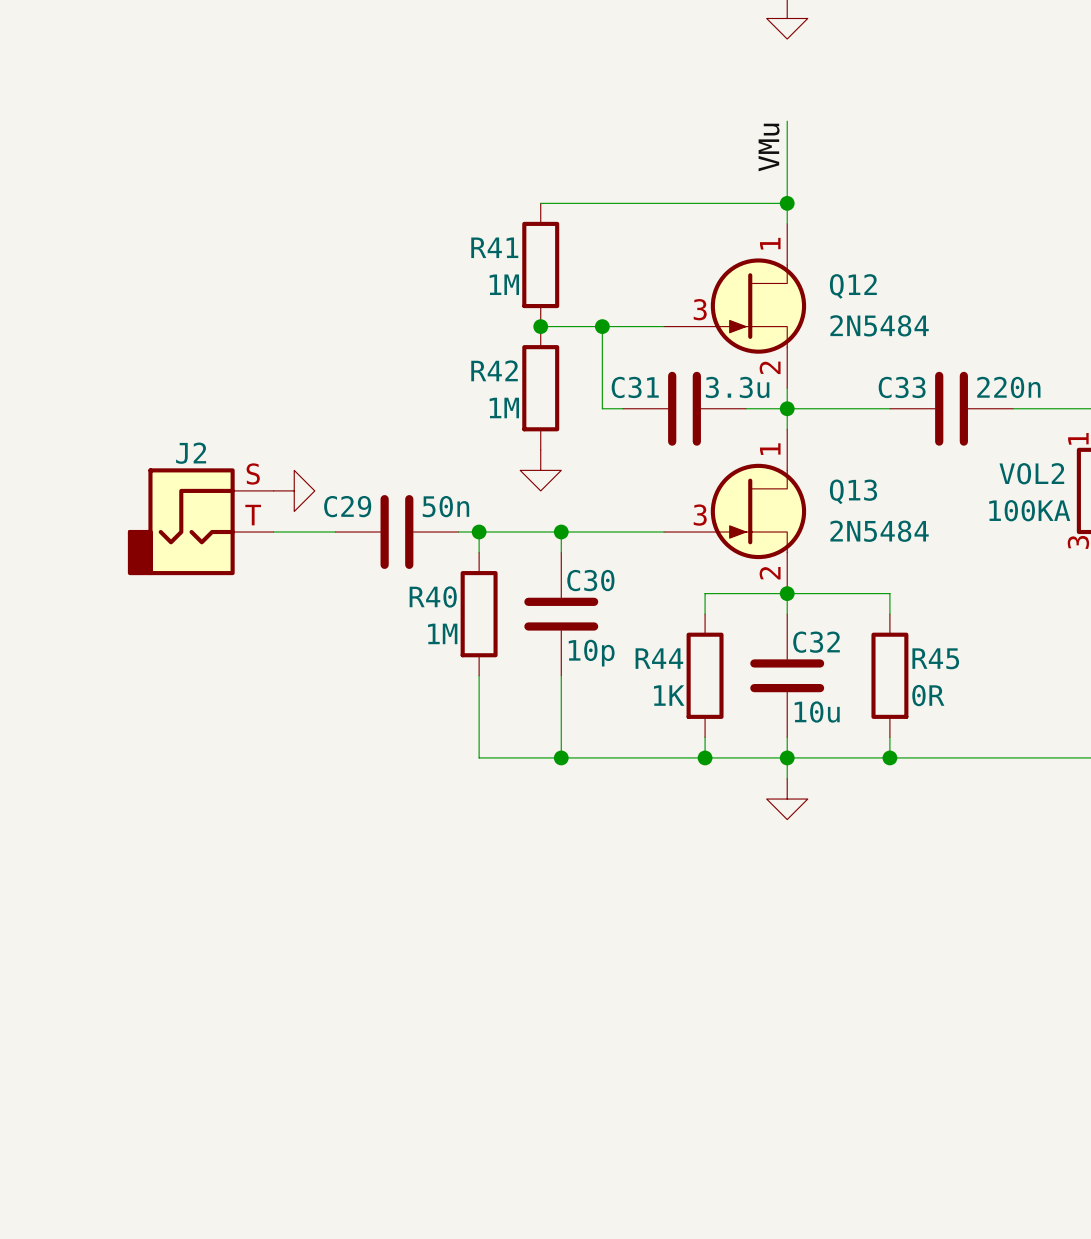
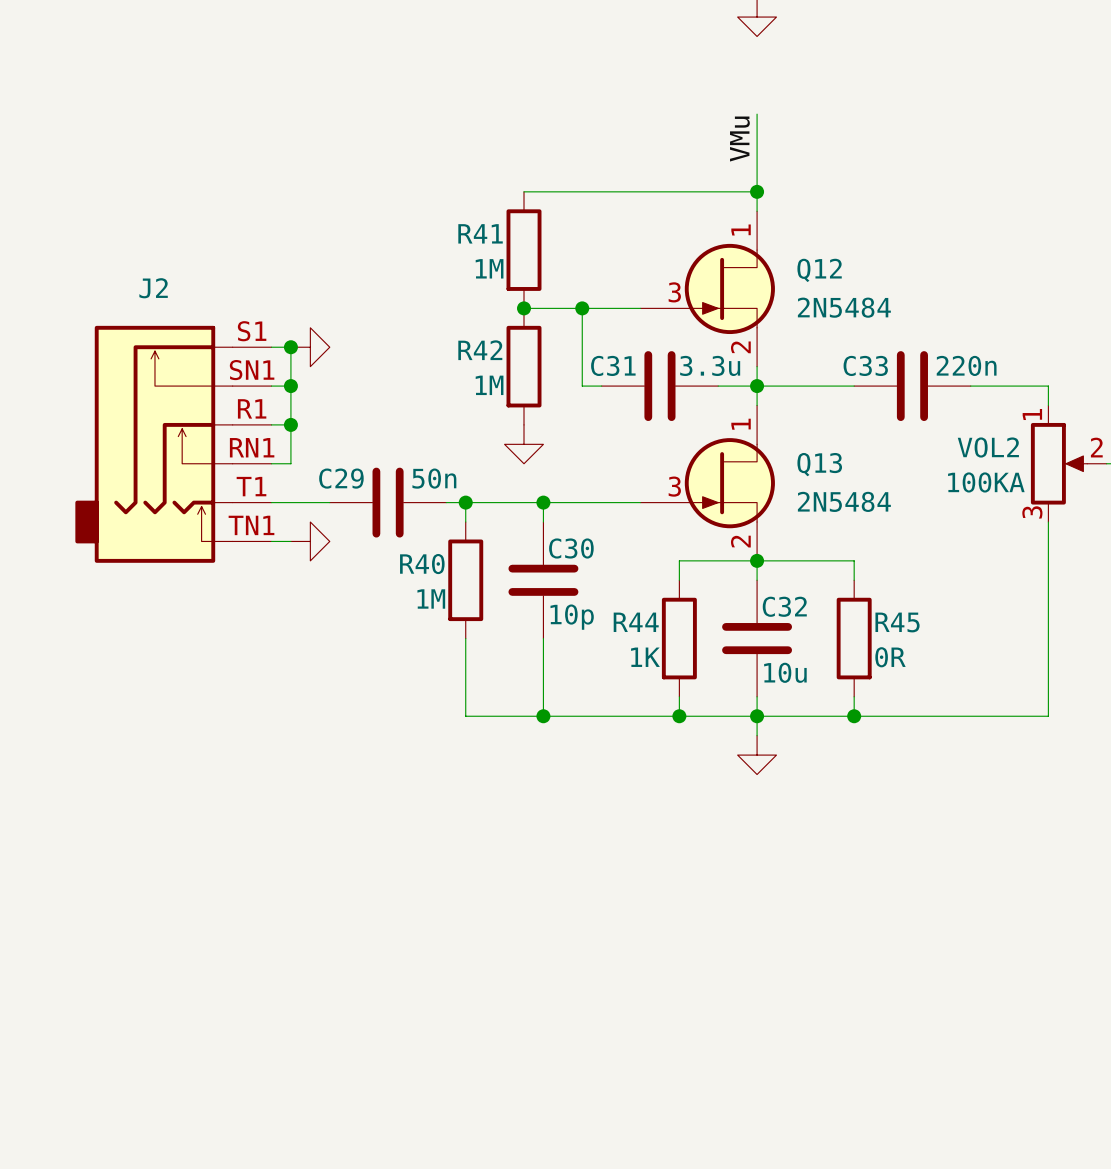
wire: none -> (271, 347) (290, 347) (290, 463) (271, 463)
junction: none -> (290, 347)
power symbol: none -> (310, 347)
wire: none -> (271, 386) (290, 386)
junction: none -> (290, 386)
wire: none -> (271, 424) (290, 424)
junction: none -> (290, 424)
J2 name position: J2 (191, 453) -> J2 (153, 288)
J2 symbol: [127, 468, 274, 576] -> [75, 325, 272, 563]
power symbol: (294, 490) -> none
wire: none -> (271, 541) (290, 541)
power symbol: none -> (310, 541)

